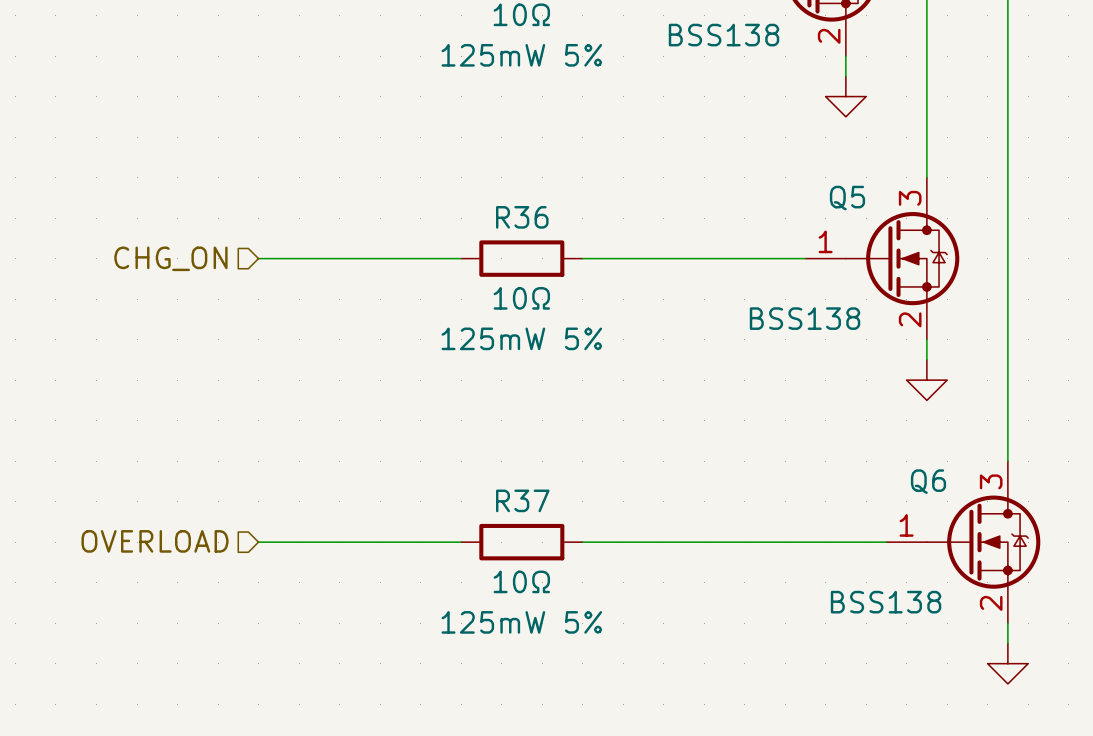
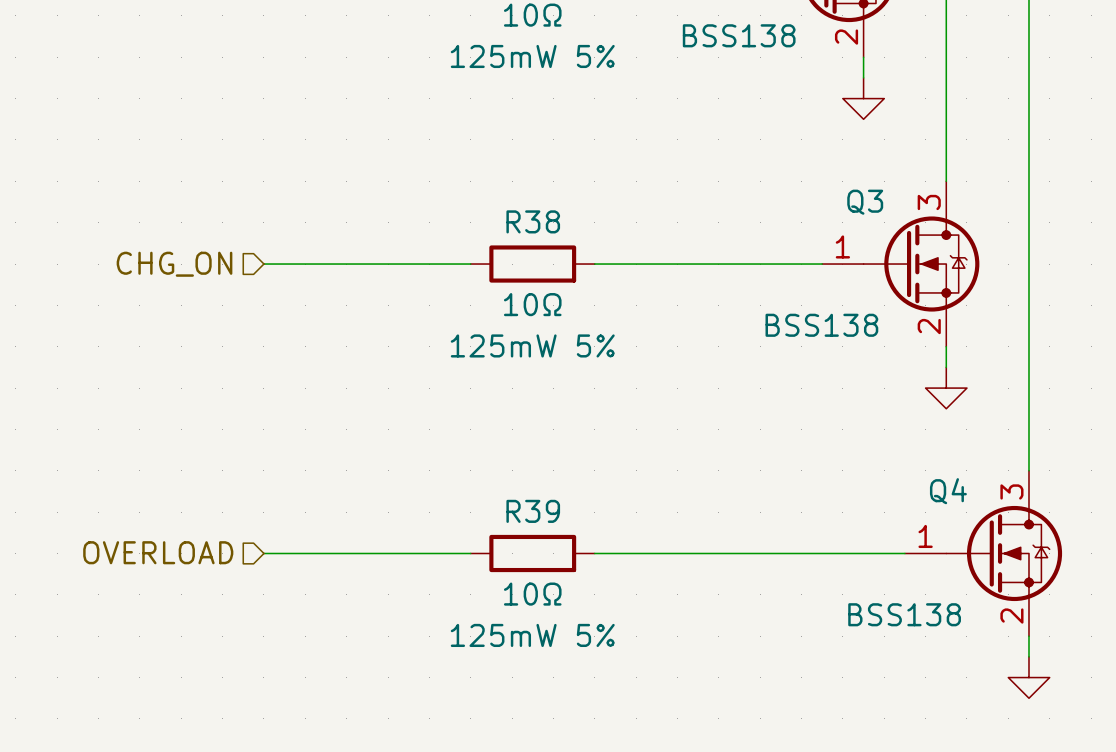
Q5 name: Q5 (847, 198) -> Q3 (865, 202)
R36 name: R36 (522, 217) -> R38 (533, 221)
Q6 name: Q6 (928, 481) -> Q4 (948, 491)
R37 name: R37 (522, 500) -> R39 (533, 511)

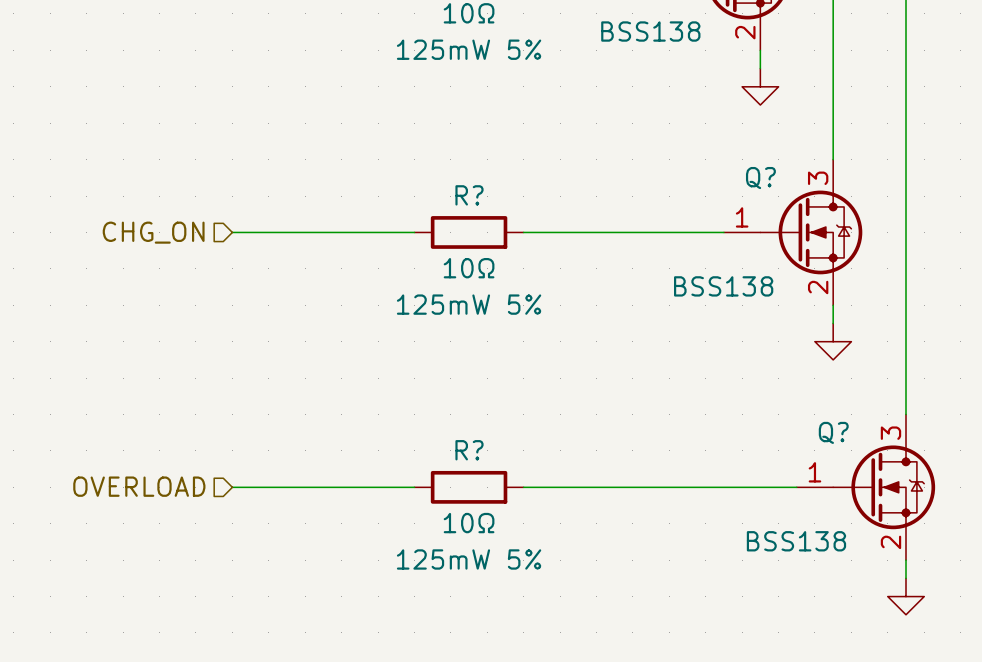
Q3 name: Q3 (865, 202) -> Q? (760, 178)
R38 name: R38 (533, 221) -> R? (469, 195)
Q4 name: Q4 (948, 491) -> Q? (833, 432)
R39 name: R39 (533, 511) -> R? (469, 450)

